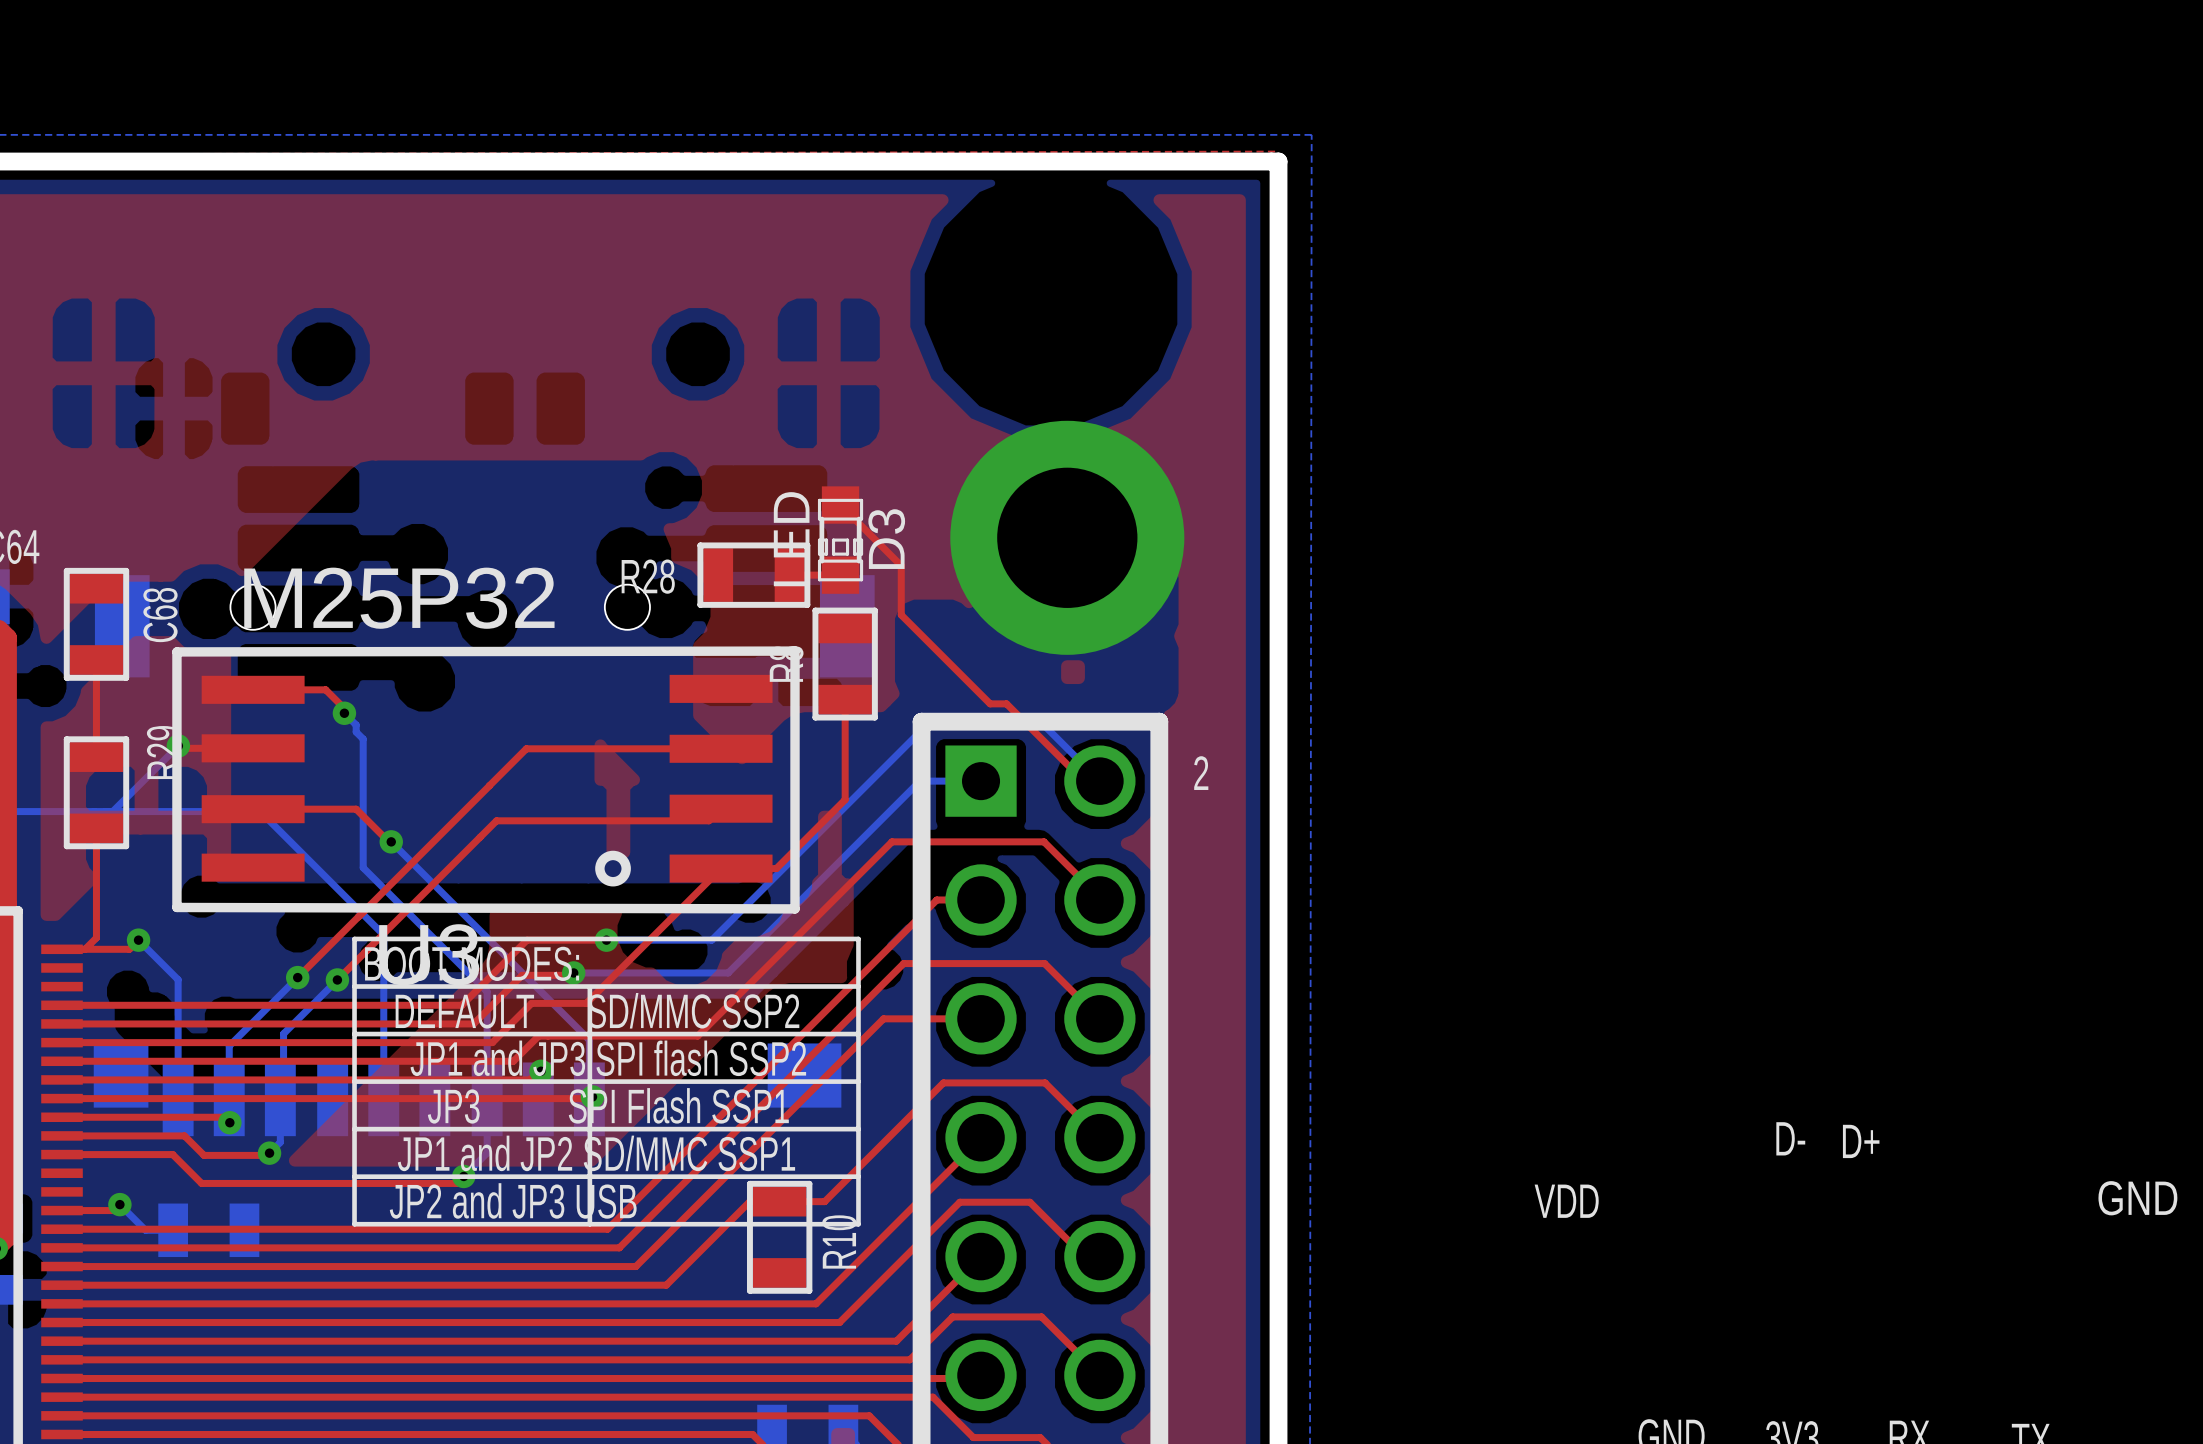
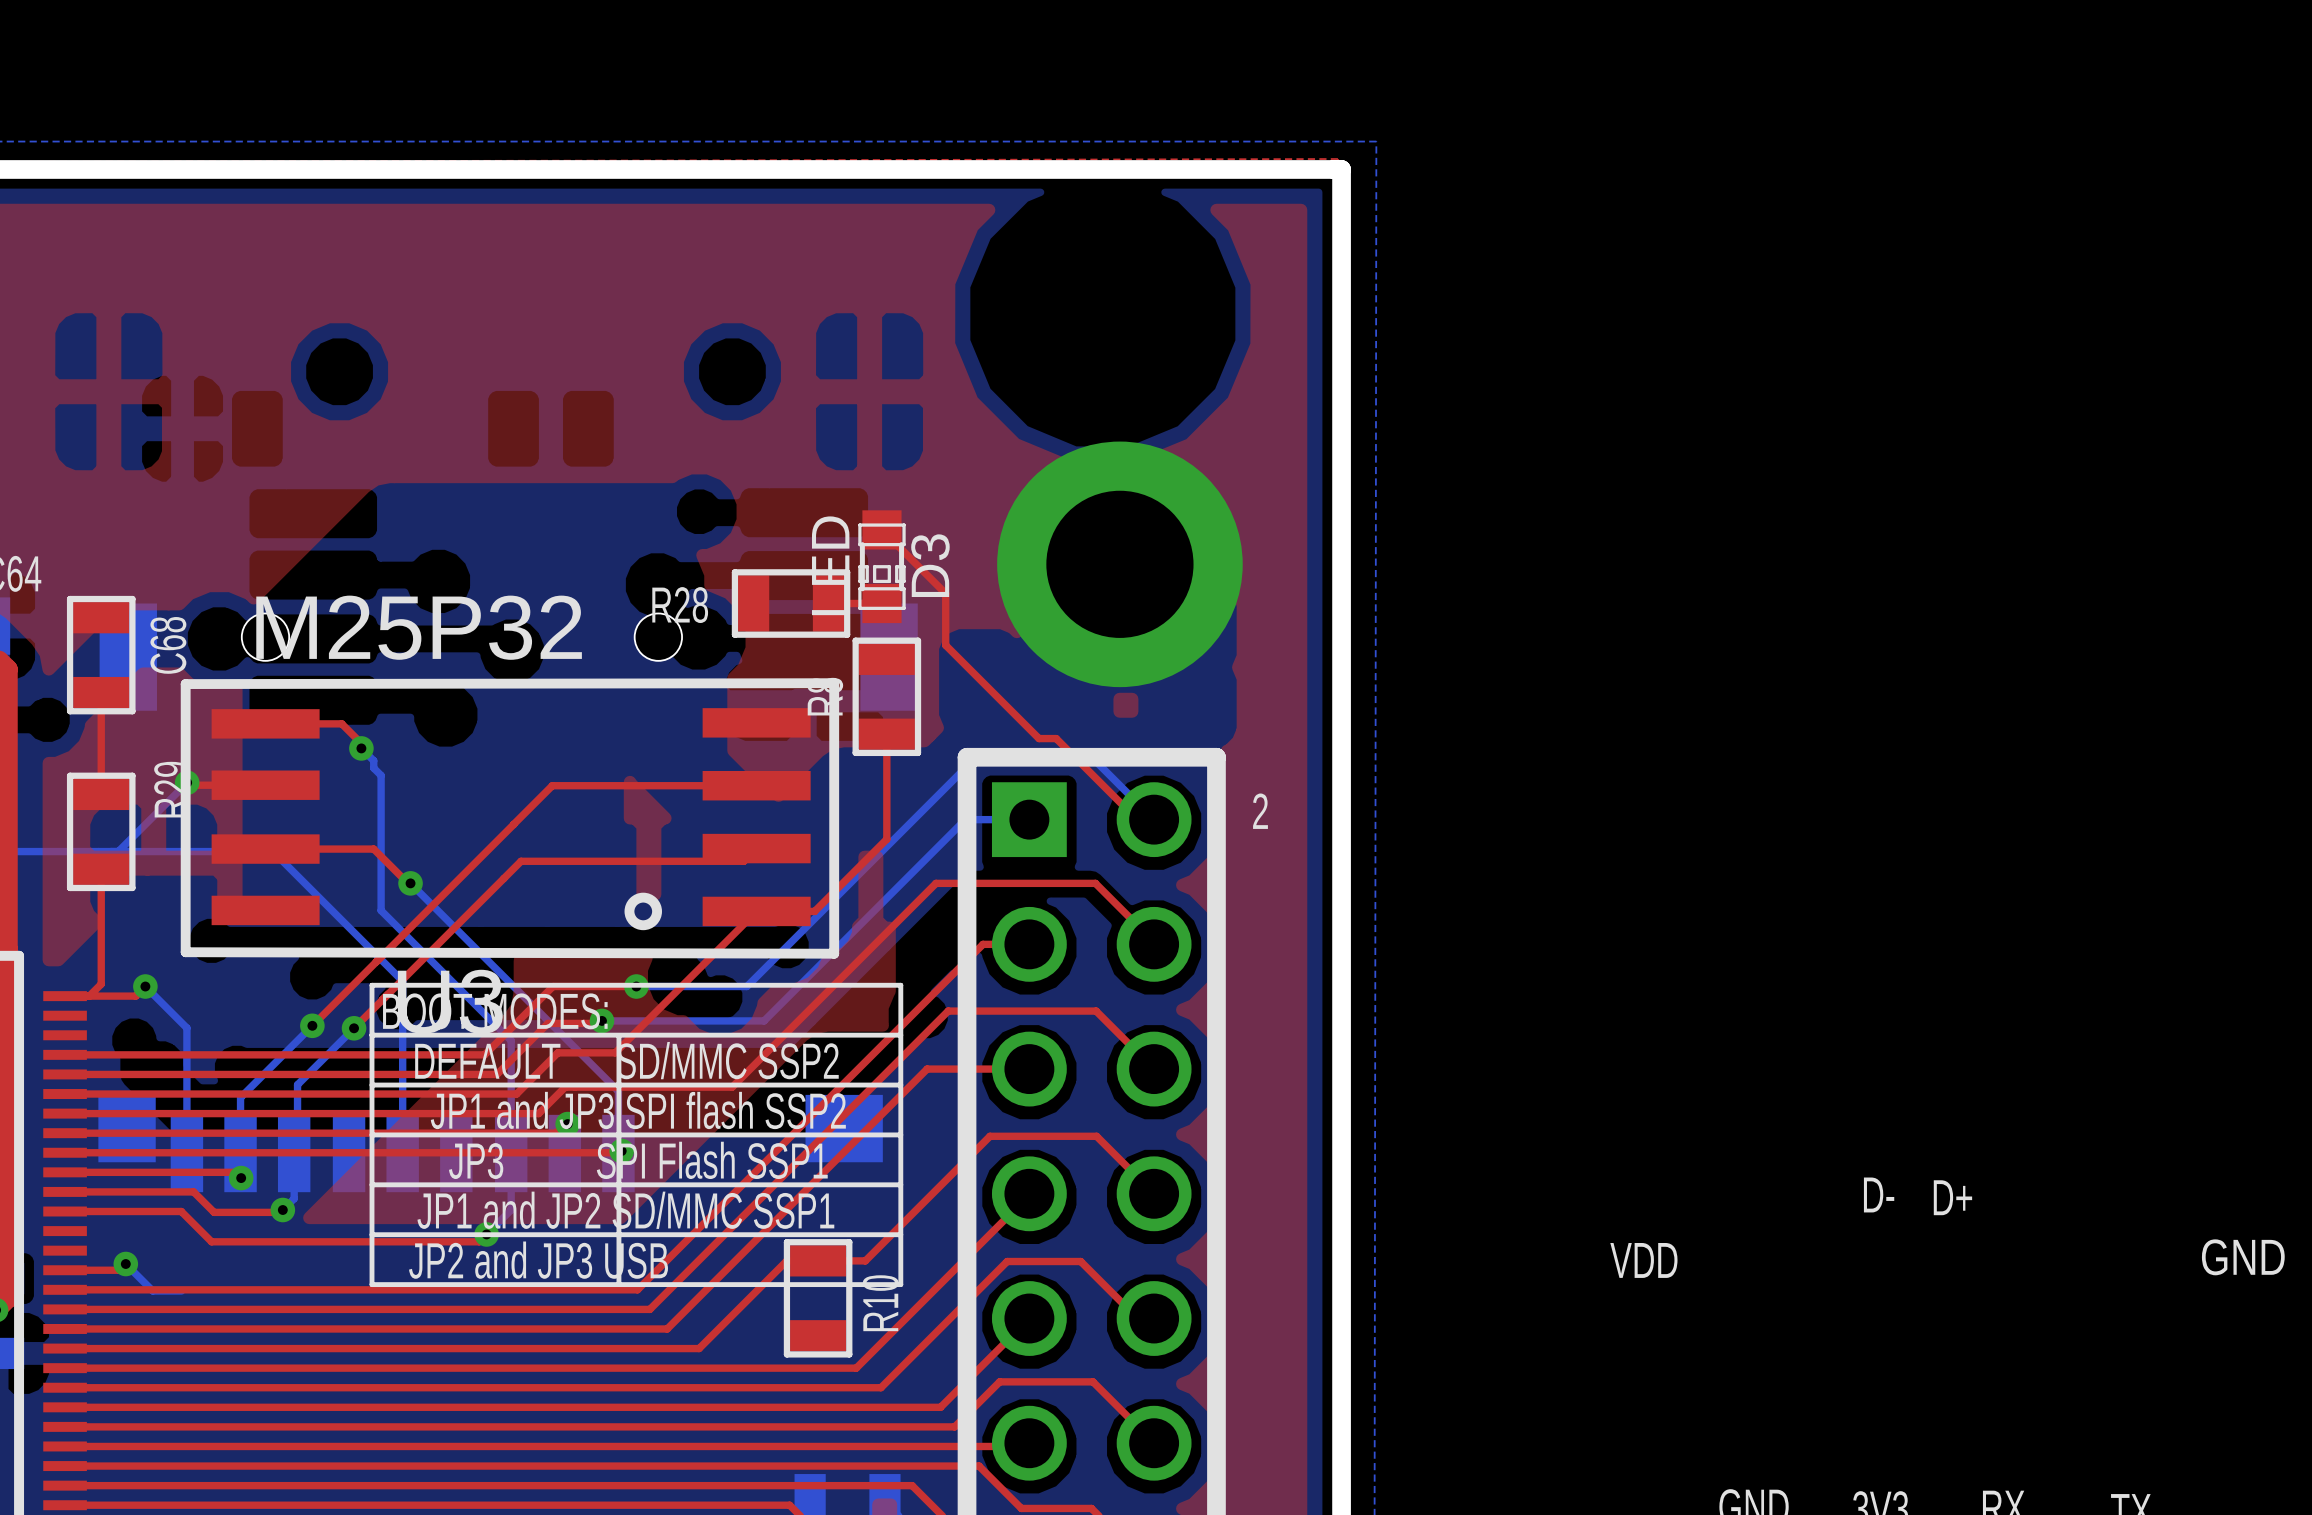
part: (208, 1230) -> none

